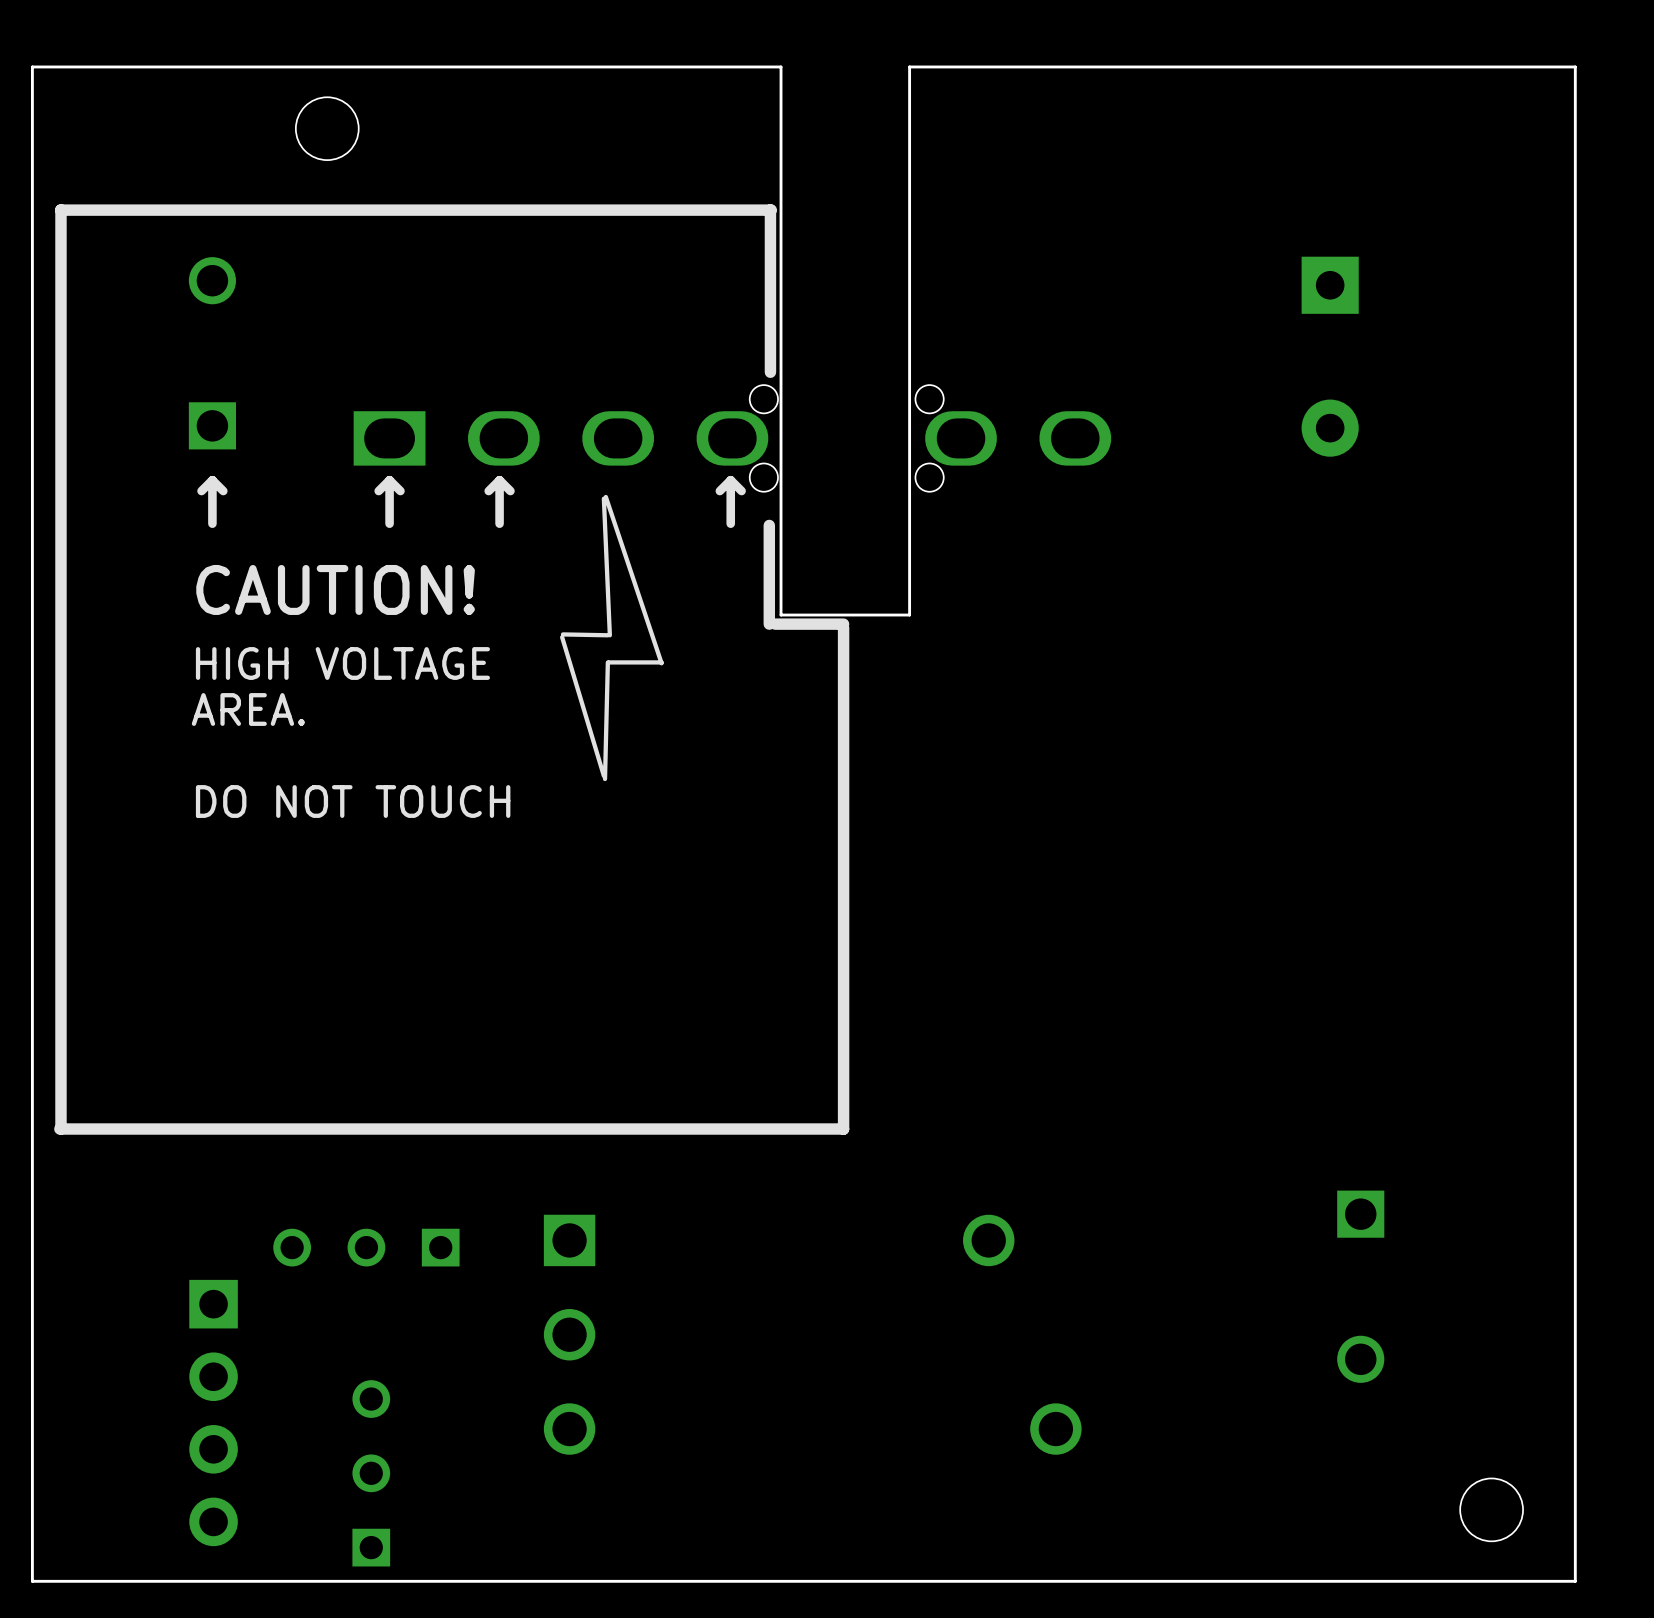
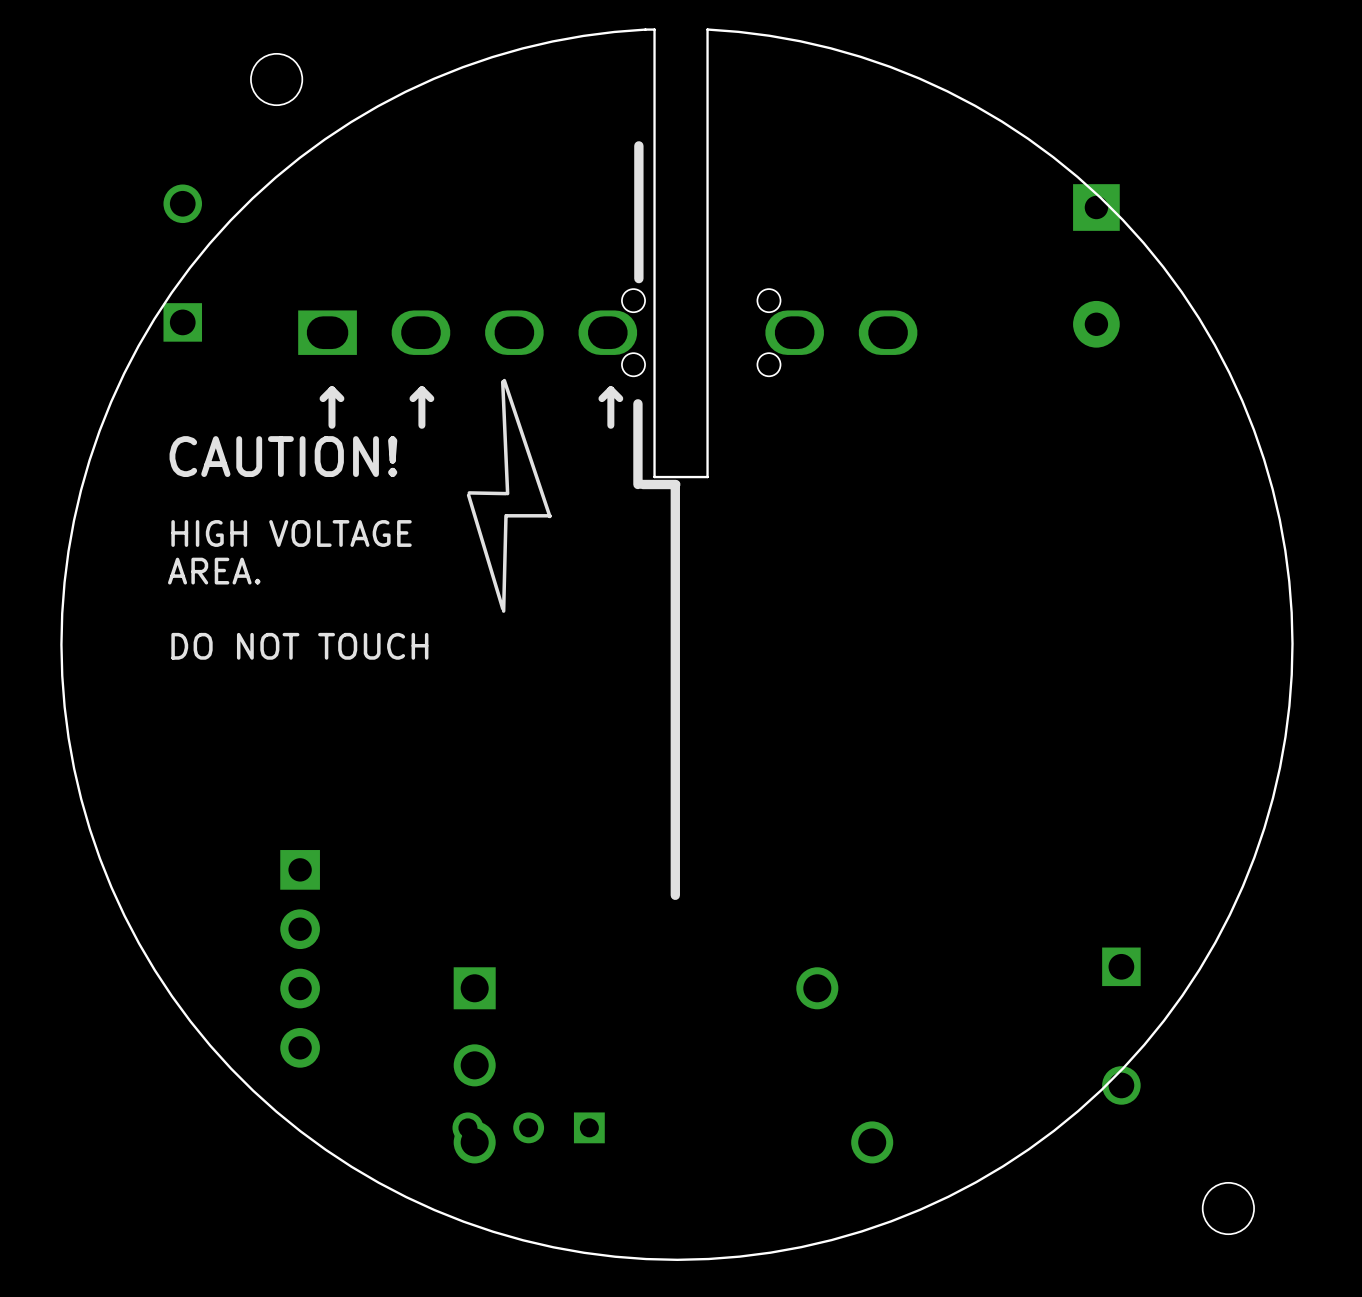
line: (60, 209) (60, 1129) -> none
line: (771, 210) (60, 210) -> none
text: ↑ (212, 501) -> none
text position: ↑ (389, 501) -> ↑ (331, 407)
text position: ↑ (499, 501) -> ↑ (421, 407)
text position: ↑ (730, 501) -> ↑ (610, 407)
board edge: (854, 615) (909, 615) (909, 66) (1575, 66) (1575, 1581) (32, 1581) (32, 66) (781, 66) (781, 615) (789, 615) -> (707, 477) (707, 29) (738, 31) (800, 41) (860, 56) (919, 78) (975, 105) (1028, 138) (1077, 176) (1122, 219) (1163, 267) (1199, 318) (1229, 372) (1253, 430) (1272, 489) (1285, 550) (1291, 612) (1291, 674) (1285, 736) (1272, 798) (1254, 857) (1229, 914) (1199, 969) (1164, 1020) (1144, 1044) (1101, 1090) (1054, 1130) (1029, 1149) (976, 1182) (920, 1209) (861, 1231) (801, 1247) (739, 1256) (677, 1259) (615, 1256) (584, 1252) (523, 1240) (463, 1221) (406, 1197) (351, 1166) (300, 1131) (253, 1090) (210, 1045) (172, 996) (138, 943) (111, 887) (99, 858) (81, 799) (68, 737) (62, 675) (61, 644) (64, 582) (73, 520) (80, 490) (99, 430) (111, 401) (138, 345) (171, 292) (189, 267) (230, 220) (252, 198) (299, 157) (351, 122) (405, 91) (433, 78) (492, 57) (552, 41) (583, 35) (654, 29) (654, 477)
line: (843, 624) (815, 624) -> (675, 895) (675, 485)
line: (843, 627) (843, 1129) -> none
text position: HIGH VOLTAGE (342, 663) -> HIGH VOLTAGE (291, 533)
text position: AREA. (248, 709) -> AREA. (214, 571)
text position: DO NOT TOUCH (353, 801) -> DO NOT TOUCH (299, 646)
line: (843, 1129) (59, 1129) -> none
part: (366, 1247) -> none
part: none -> (528, 1127)
part position: (213, 1413) -> (300, 958)
part: (371, 1473) -> none

